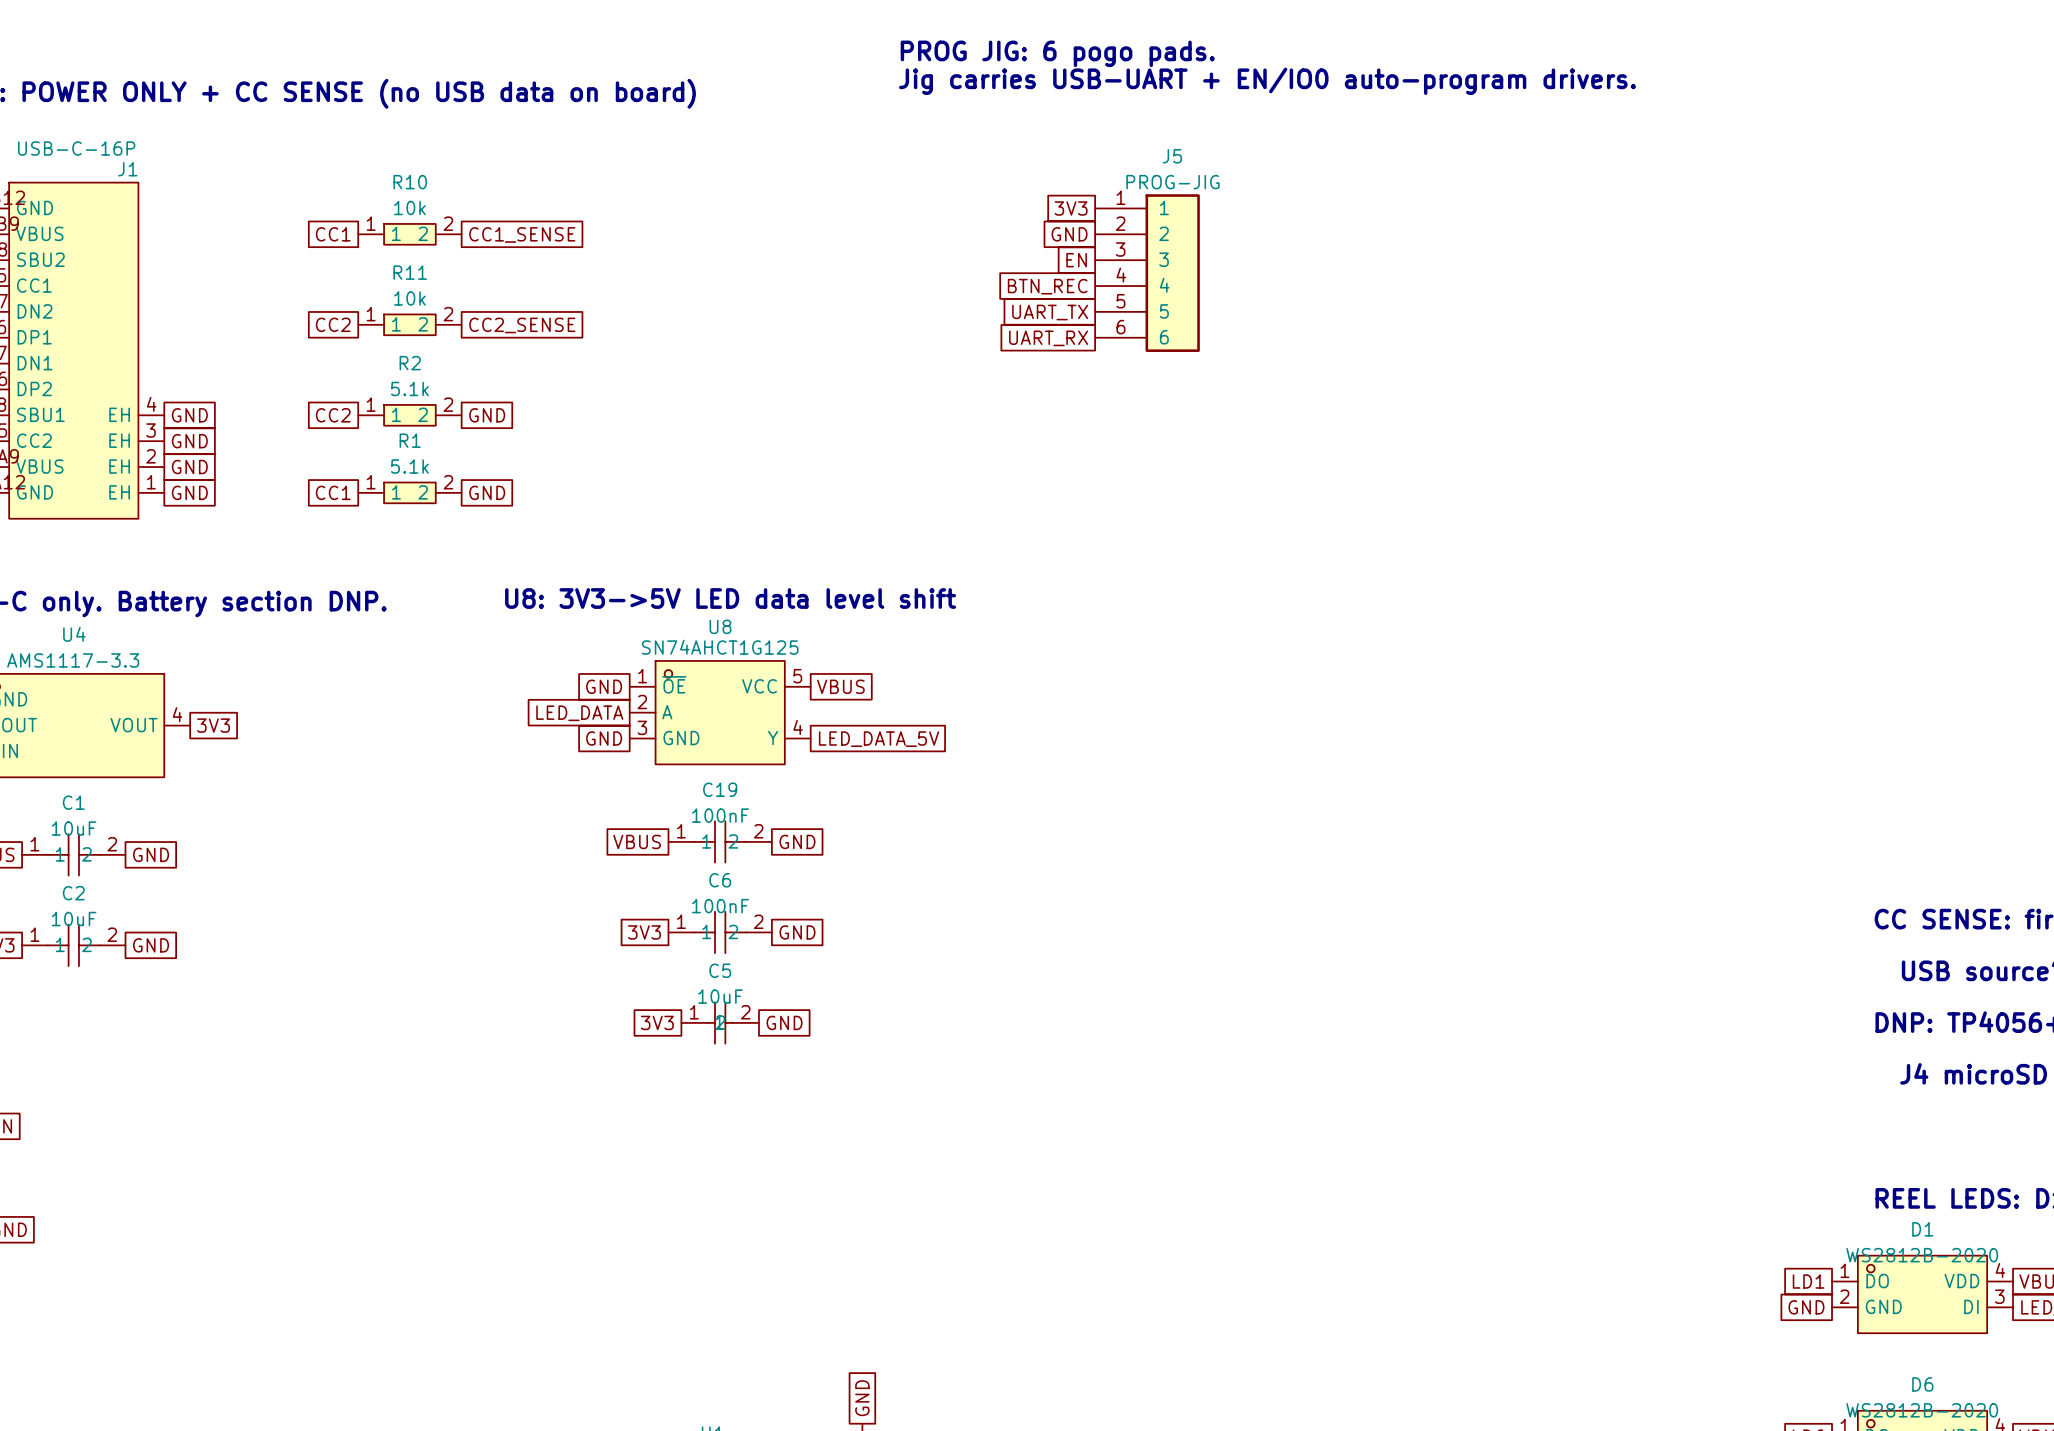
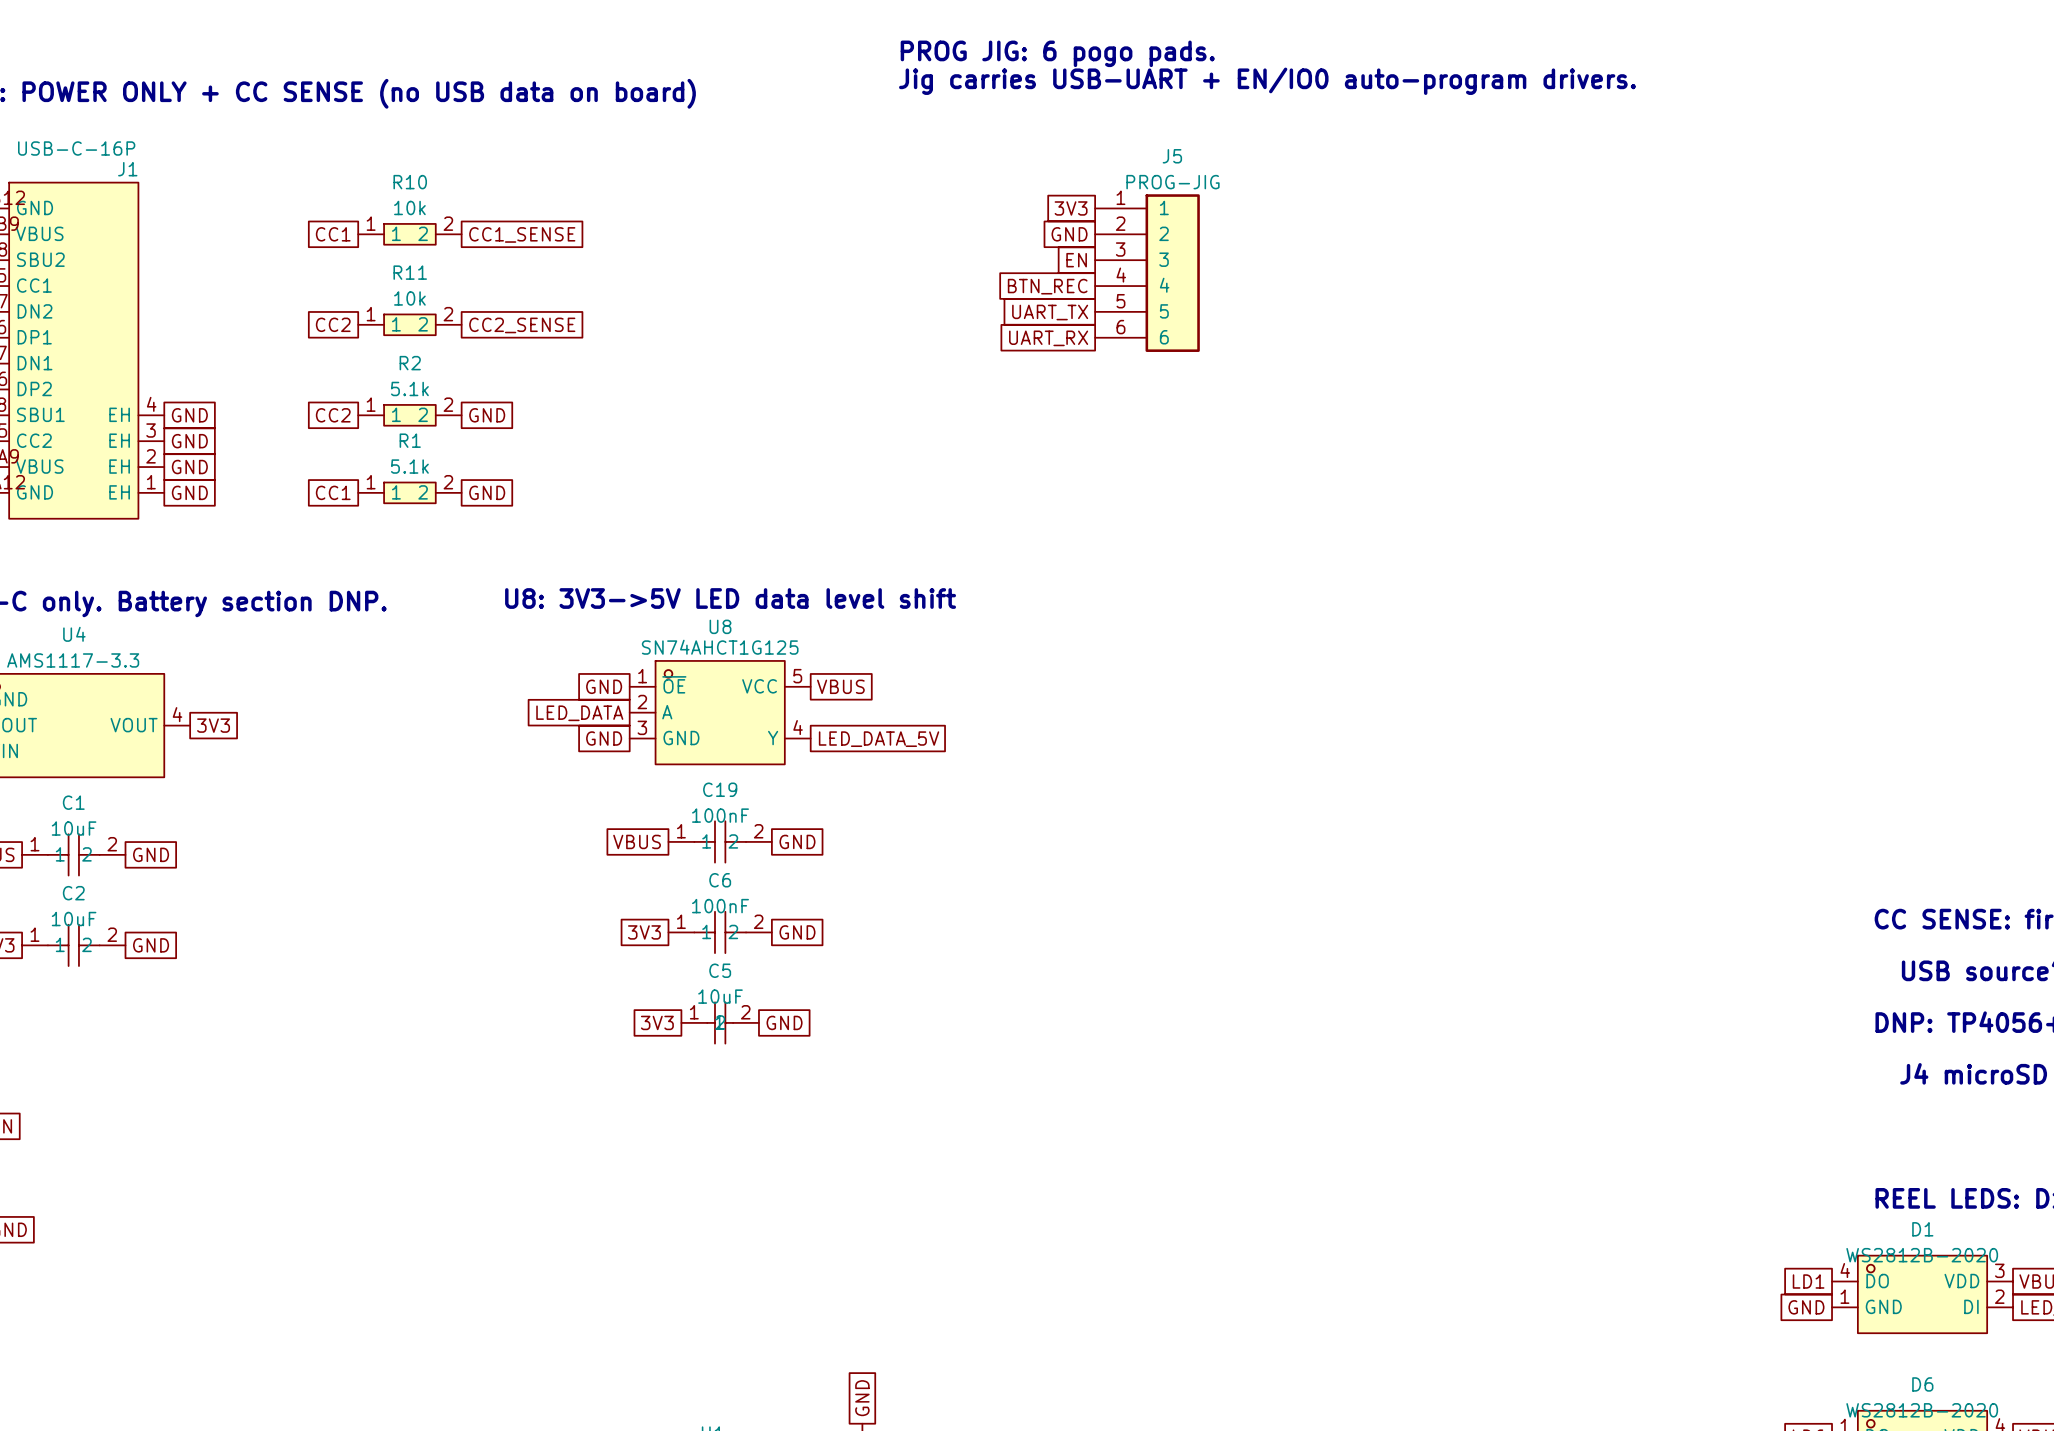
D1 pin number: 1 (1844, 1270) -> 4 (1845, 1270)
D1 pin number: 4 (2000, 1270) -> 3 (1999, 1270)
D1 pin number: 2 (1844, 1296) -> 1 (1844, 1296)
D1 pin number: 3 (1999, 1296) -> 2 (1999, 1296)

